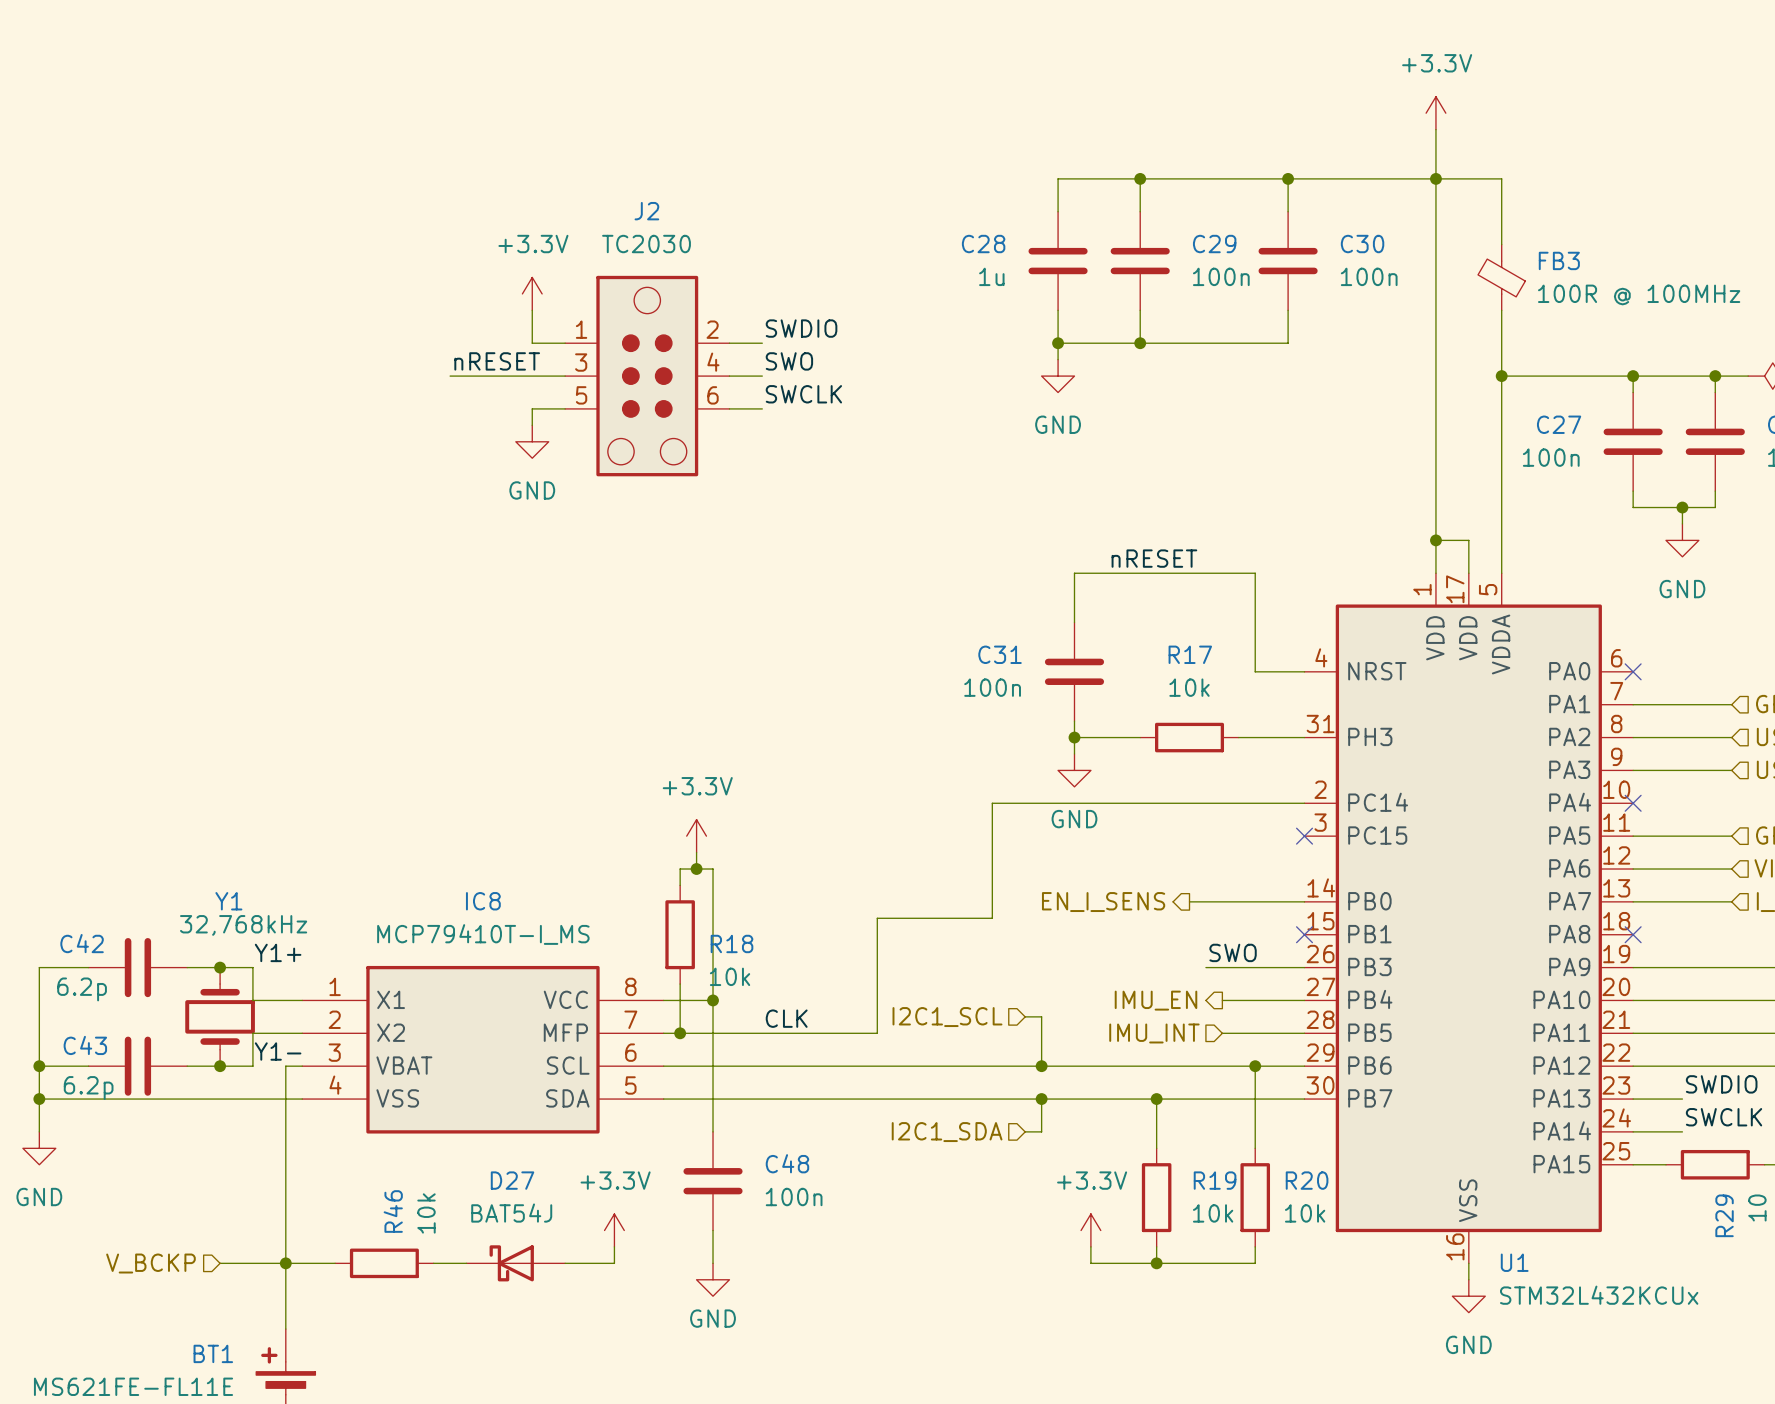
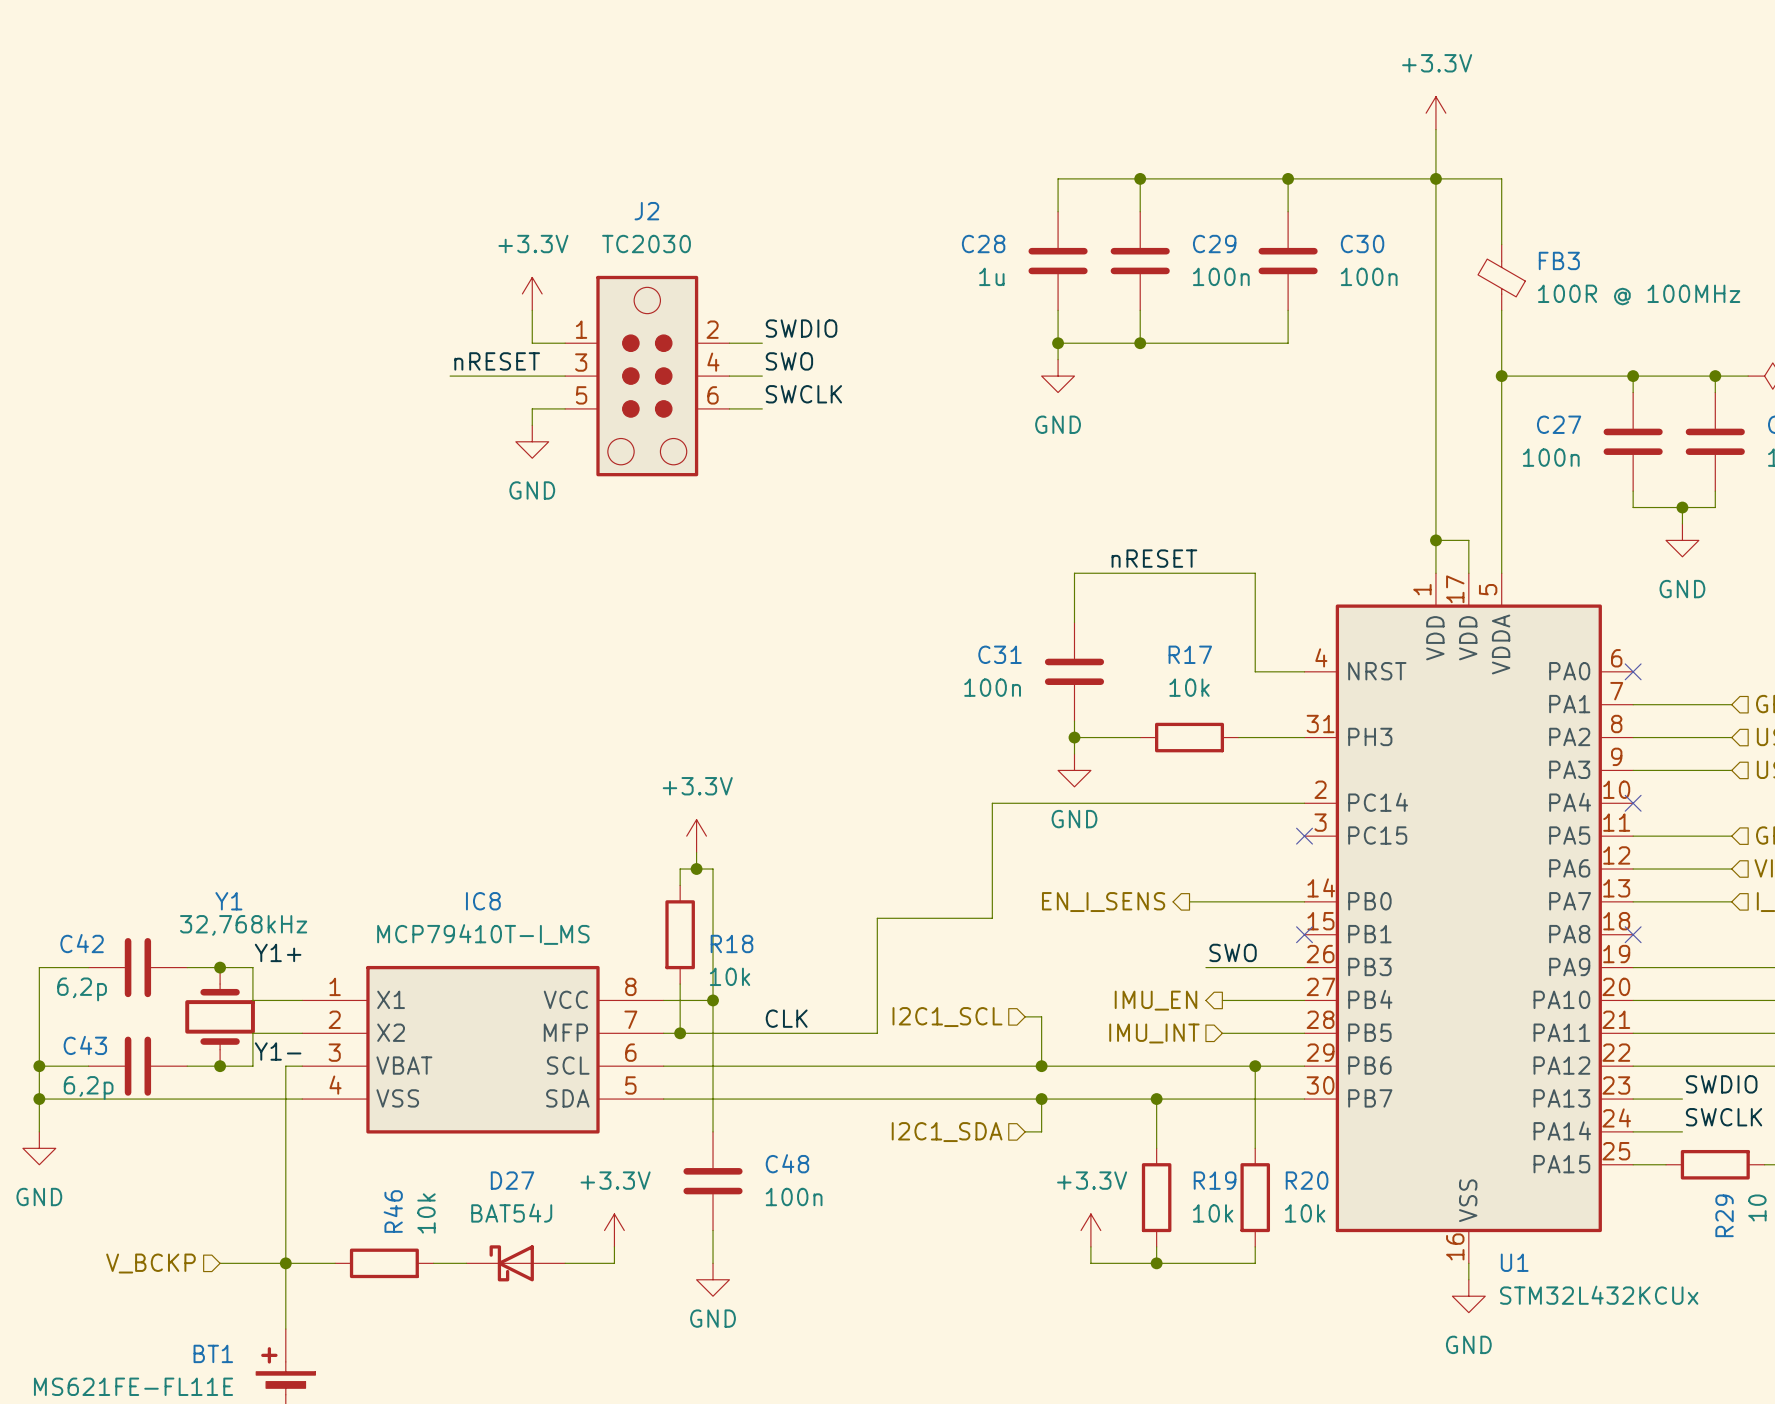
C42 value: 6.2p (82, 989) -> 6,2p (82, 989)
C43 value: 6.2p (88, 1088) -> 6,2p (88, 1088)

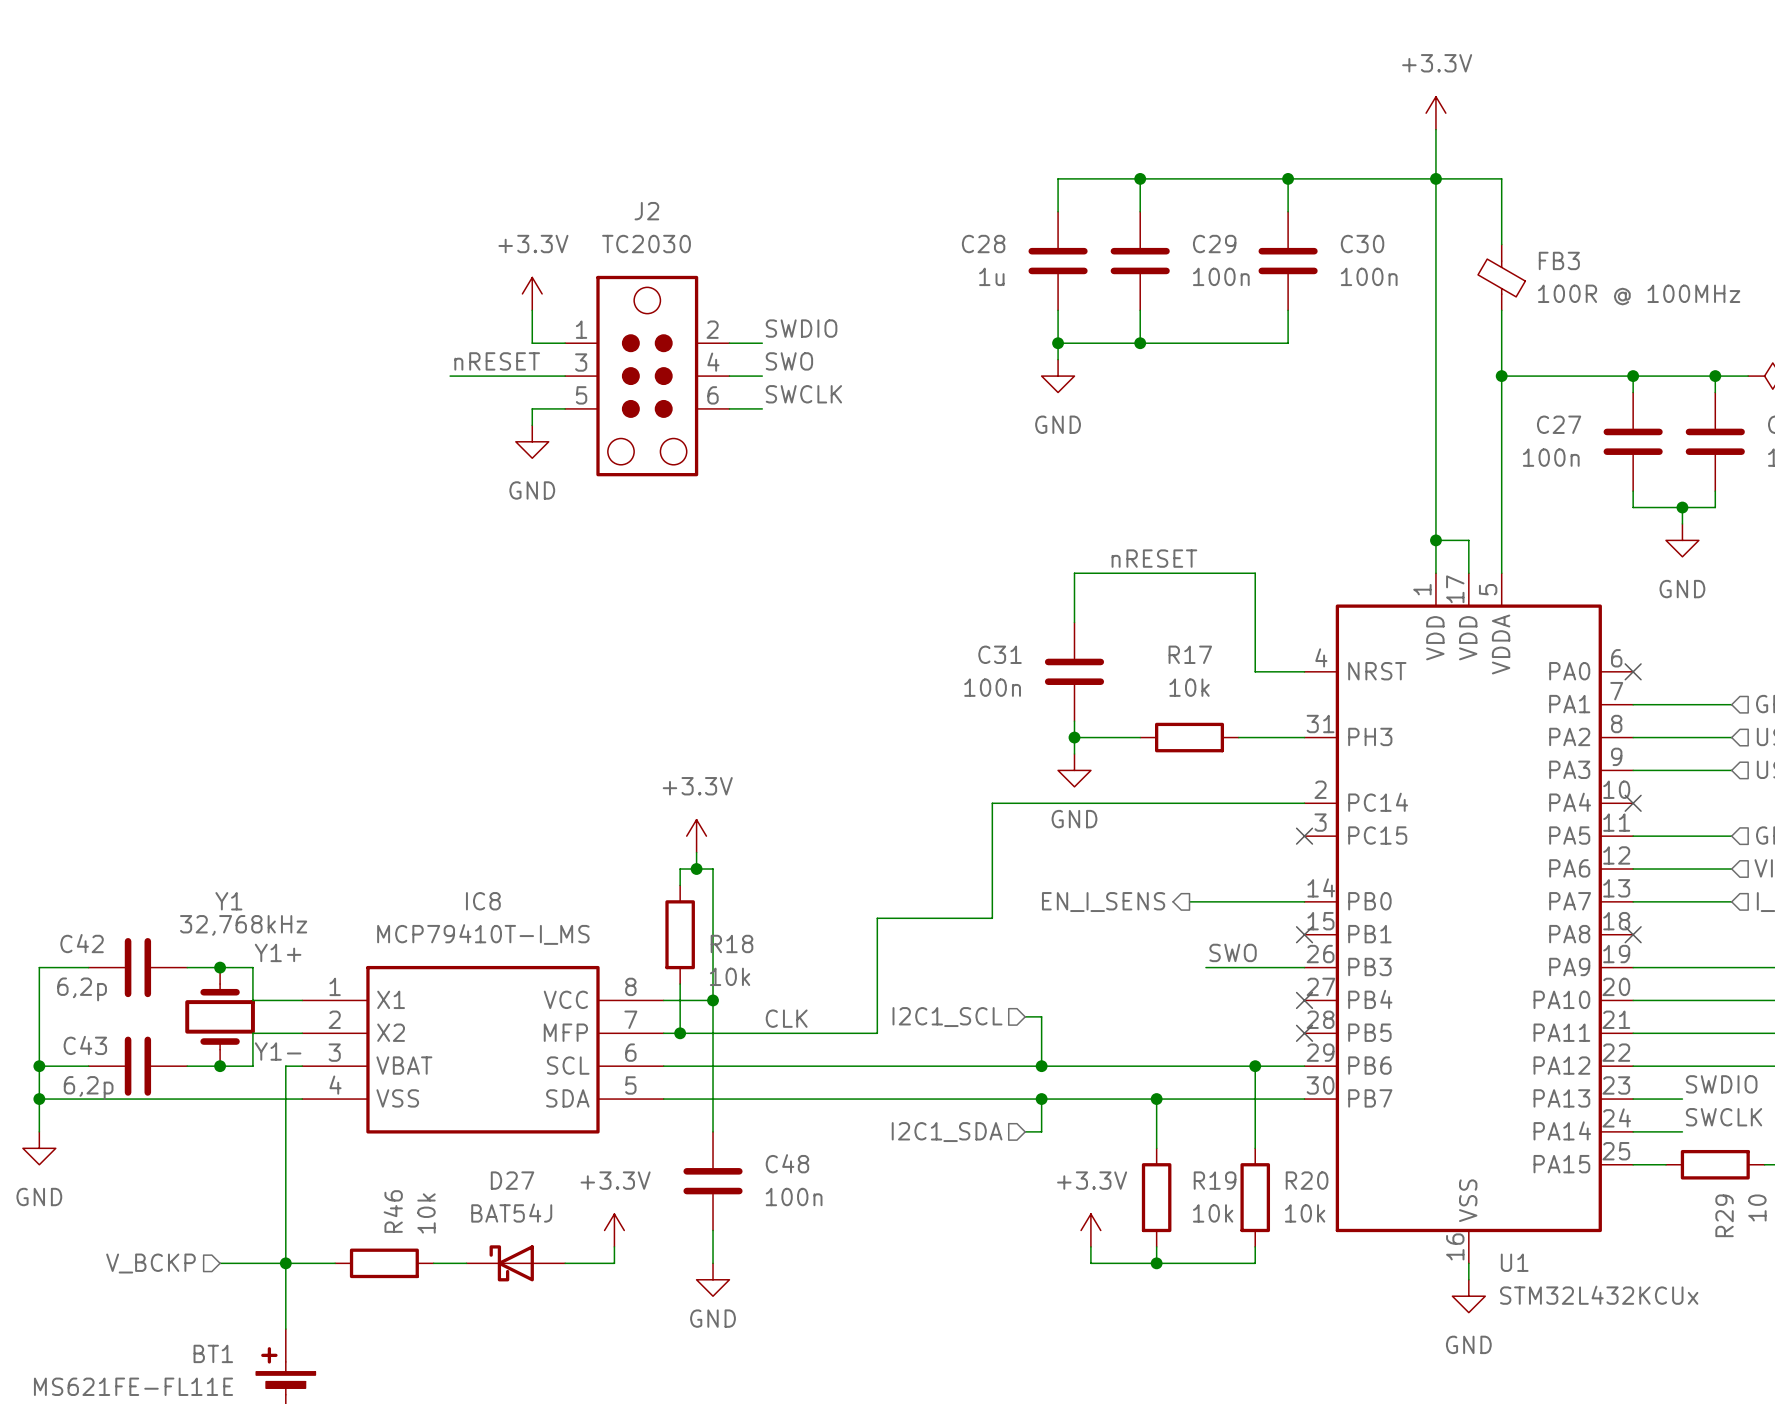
hierarchical label: IMU_EN (1155, 1000) -> none
wire: (1222, 1000) (1304, 1000) -> none
no-connect mark: none -> (1304, 1000)
hierarchical label: IMU_INT (1154, 1033) -> none
wire: (1222, 1033) (1304, 1033) -> none
no-connect mark: none -> (1304, 1033)

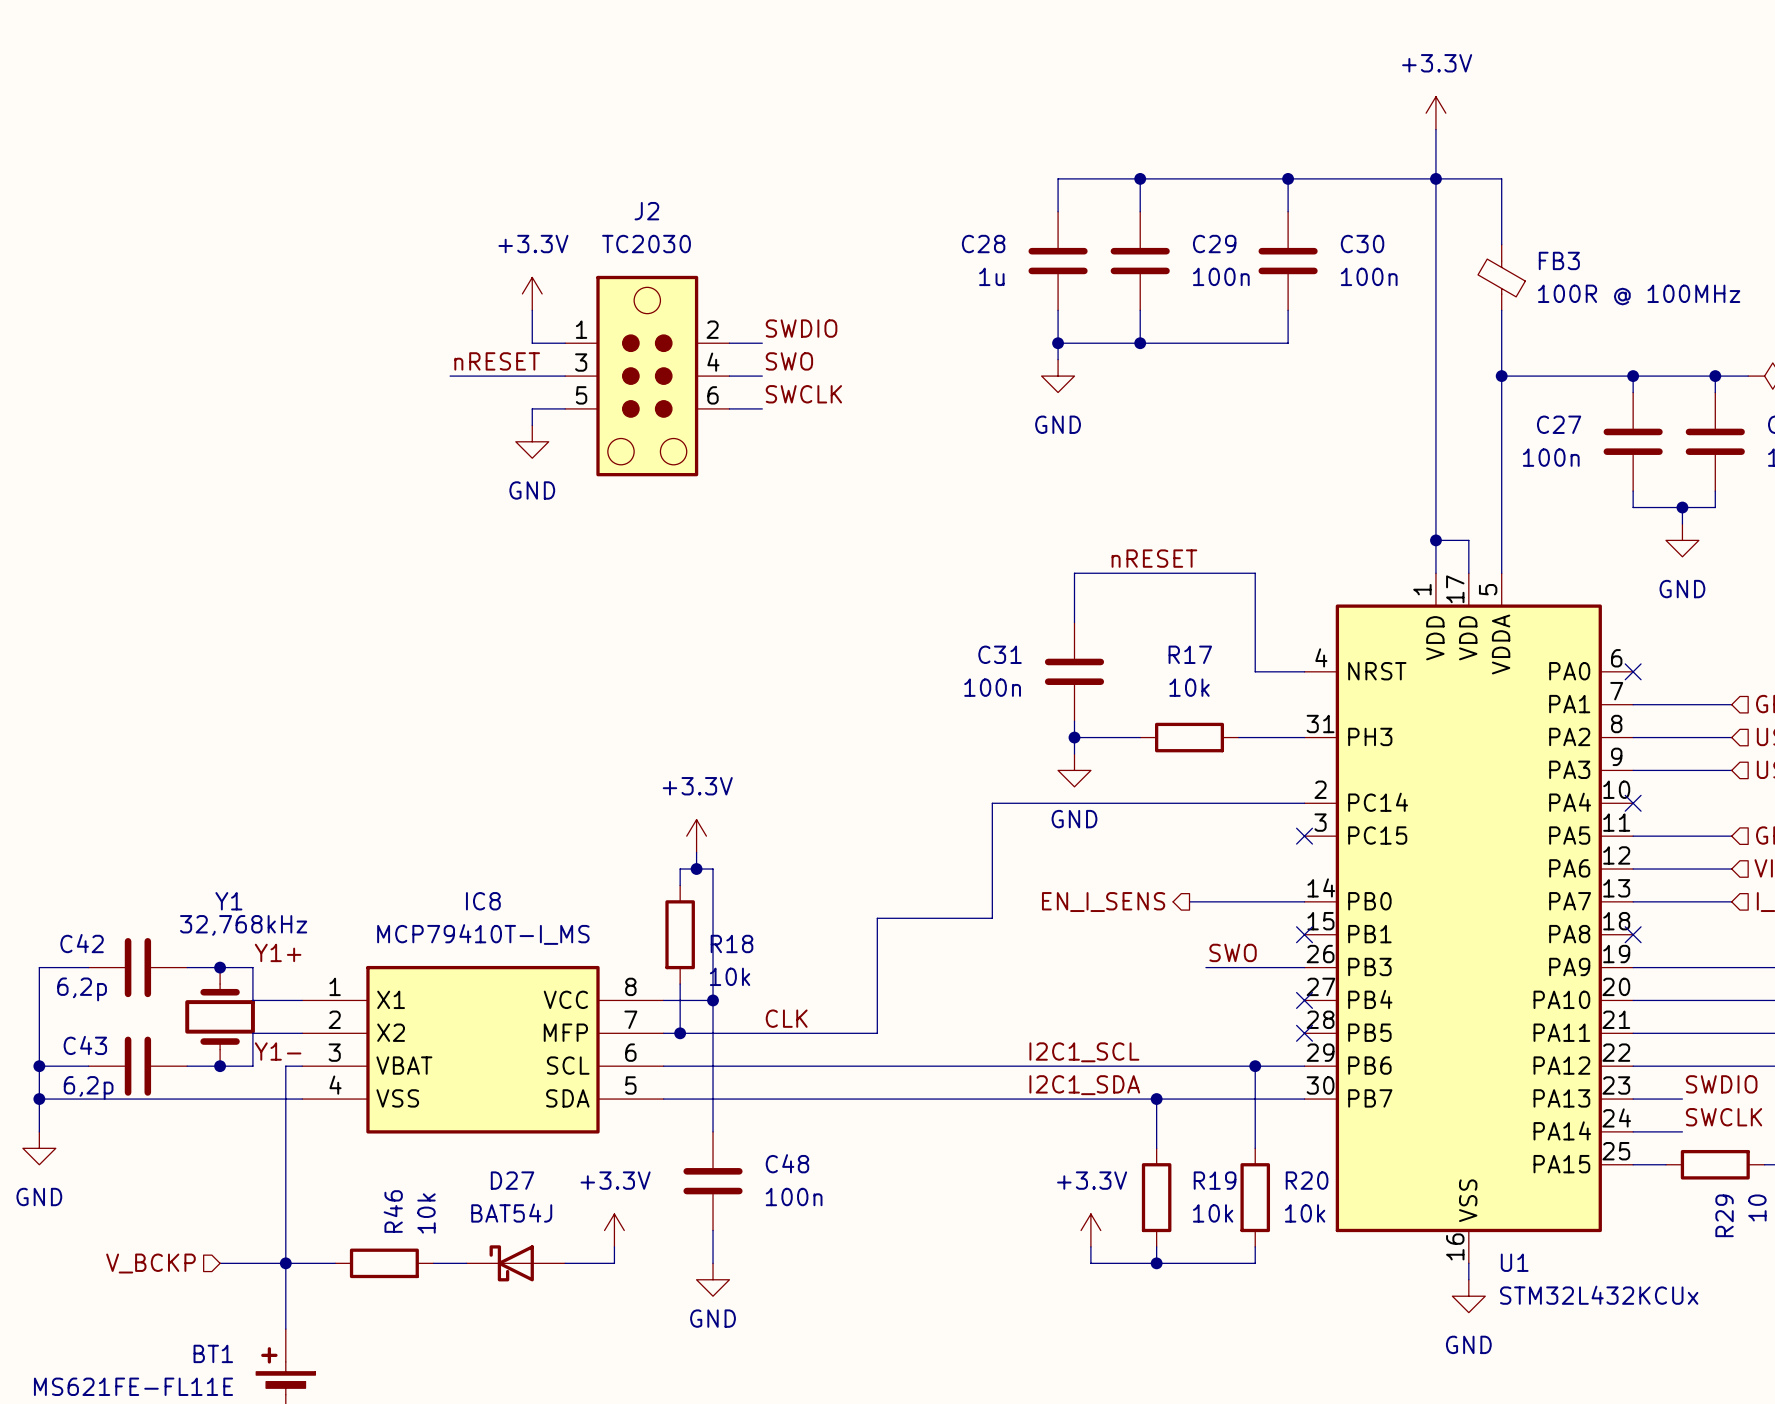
wire: (1025, 1016) (1041, 1016) (1041, 1066) -> none
hierarchical label: I2C1_SCL (947, 1017) -> none
label: none -> I2C1_SCL (1084, 1052)
junction: (1041, 1066) -> none
label: none -> I2C1_SDA (1084, 1085)
wire: (1041, 1099) (1041, 1131) (1025, 1131) -> none
junction: (1041, 1099) -> none
hierarchical label: I2C1_SDA (947, 1132) -> none

